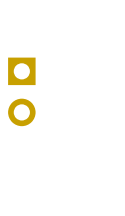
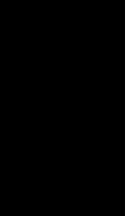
part: (21, 91) -> none

